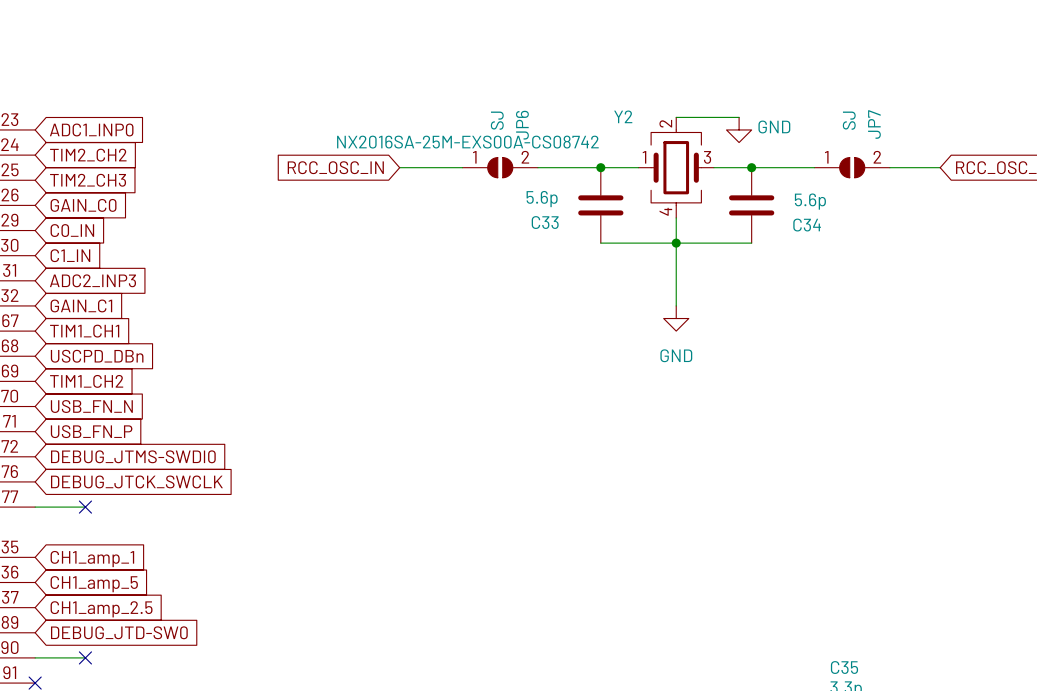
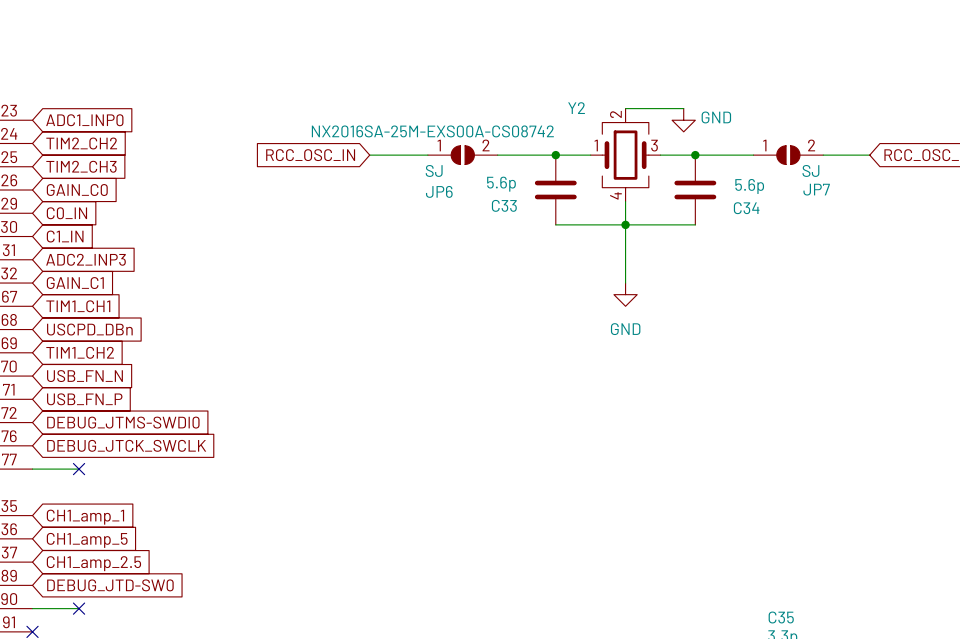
JP6 value rotation: 0° (497, 120) -> 90° clockwise (434, 170)
JP6 value position: SJ (497, 120) -> SJ (434, 170)
JP7 value rotation: 0° (849, 120) -> 90° clockwise (810, 170)
JP7 value position: SJ (849, 120) -> SJ (810, 170)
JP7 name rotation: 0° (874, 124) -> 90° clockwise (816, 189)
JP7 name position: JP7 (874, 124) -> JP7 (816, 189)
JP6 name rotation: 0° (522, 125) -> 90° clockwise (439, 191)
JP6 name position: JP6 (522, 125) -> JP6 (439, 191)

